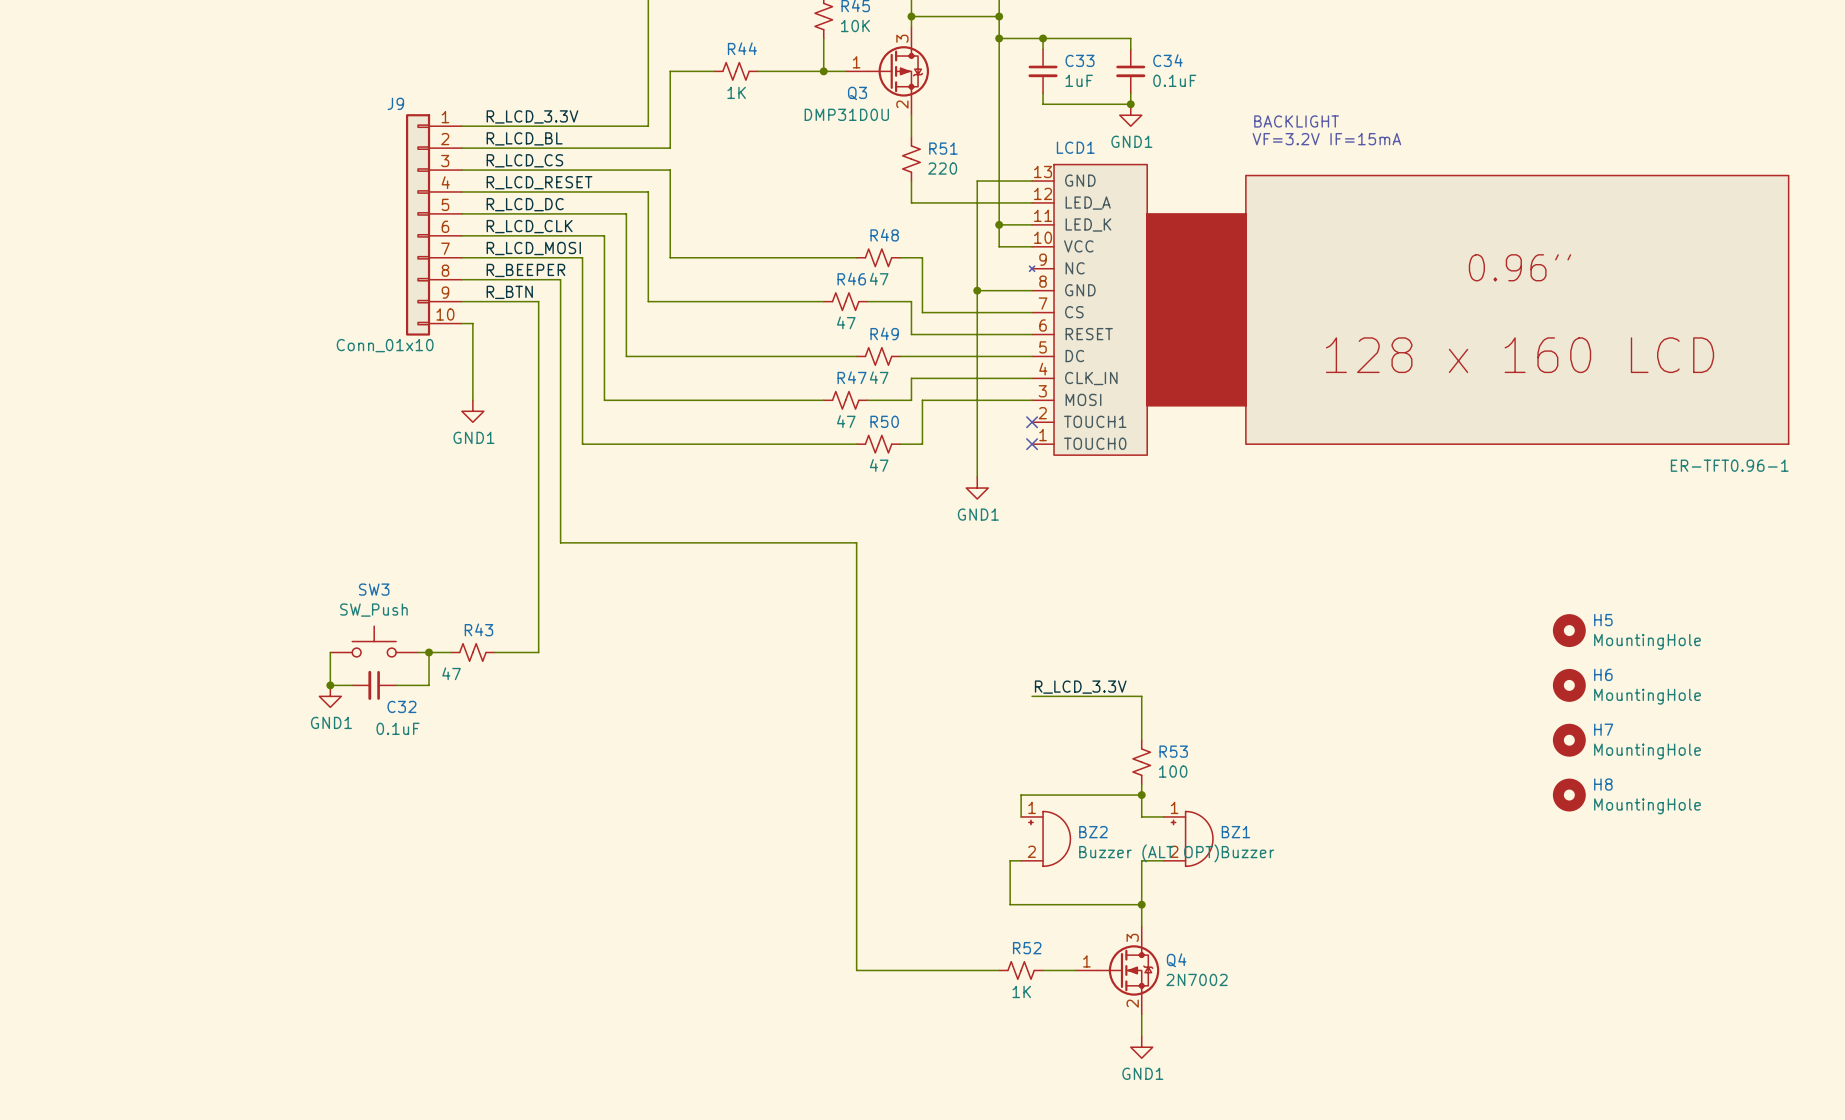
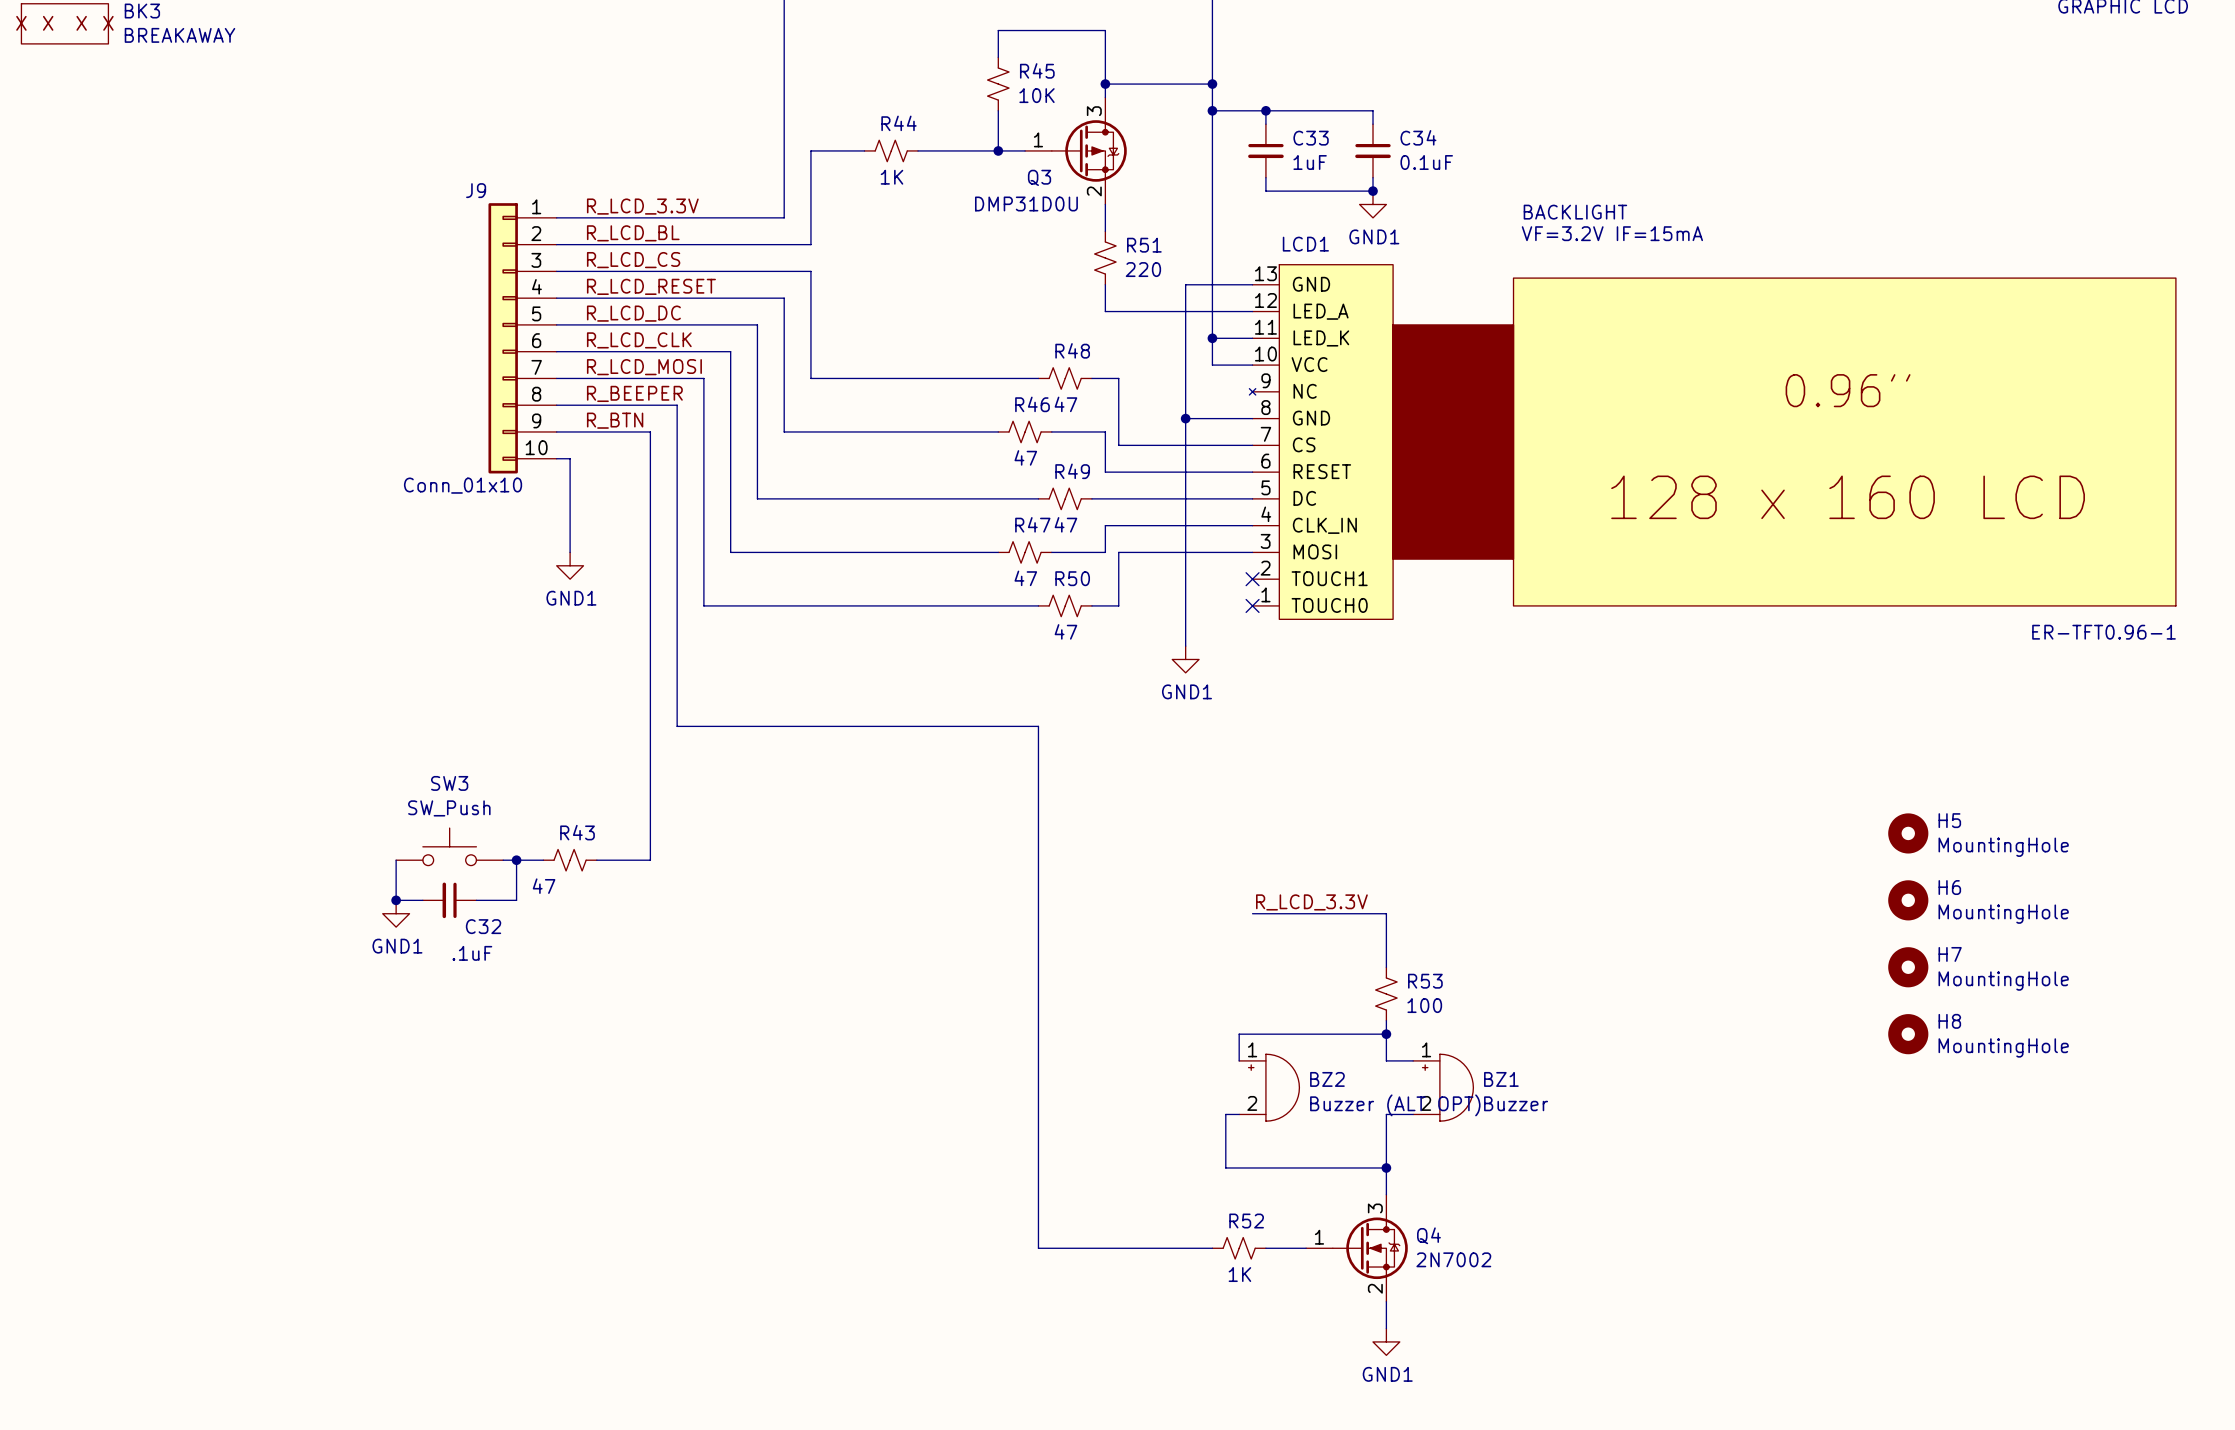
C32 value: 0.1uF (398, 728) -> .1uF (472, 953)

